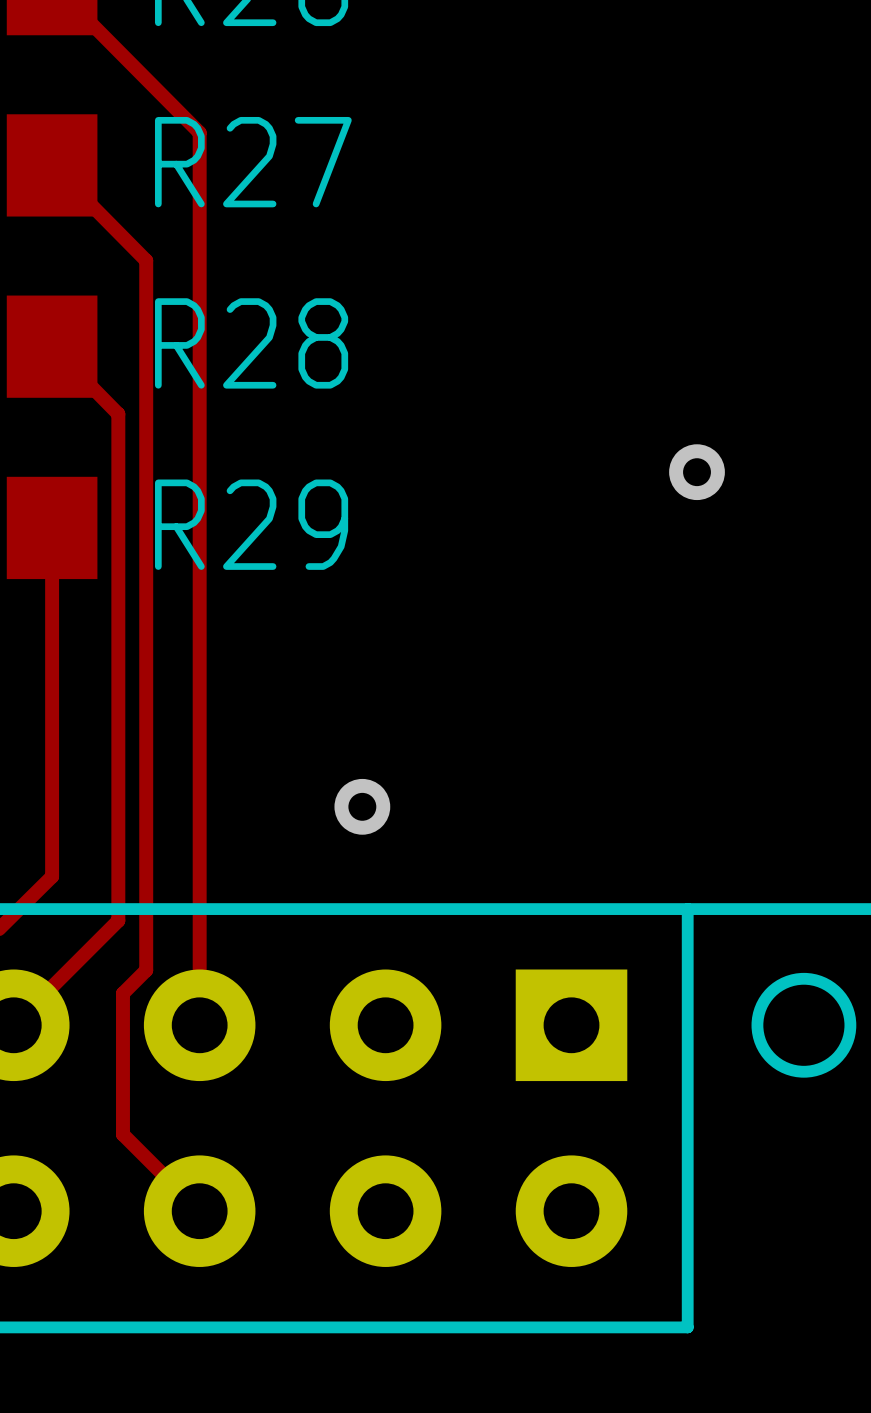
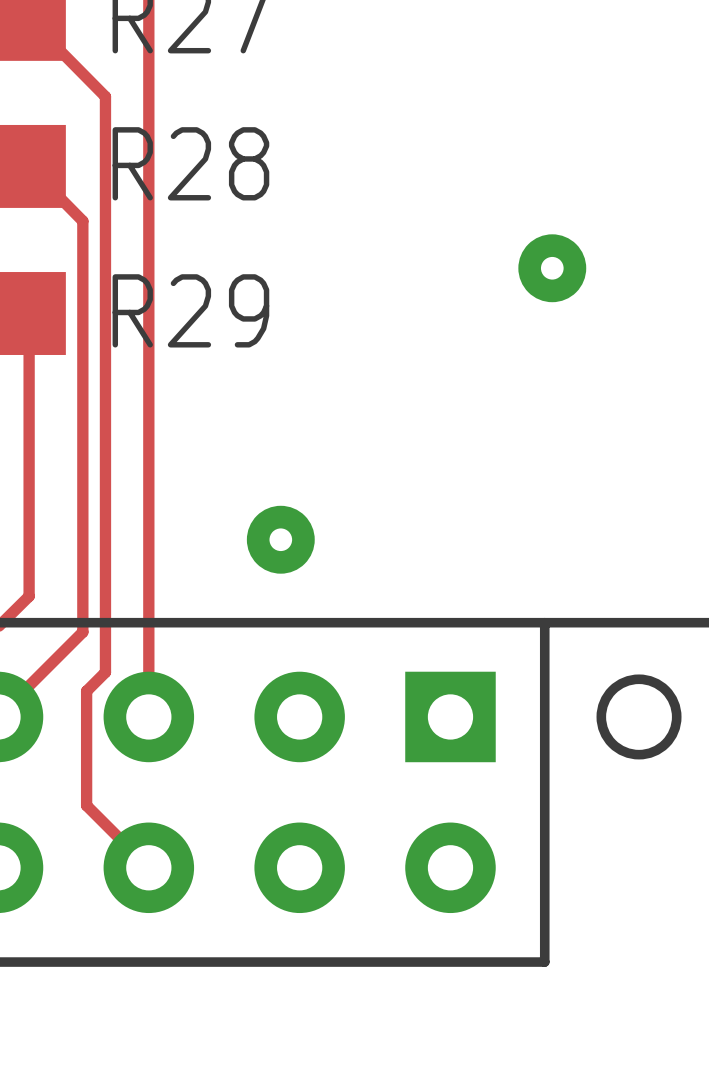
via size: [669, 444, 725, 501] -> [518, 234, 587, 303]
via size: [334, 778, 391, 835] -> [246, 505, 315, 574]

